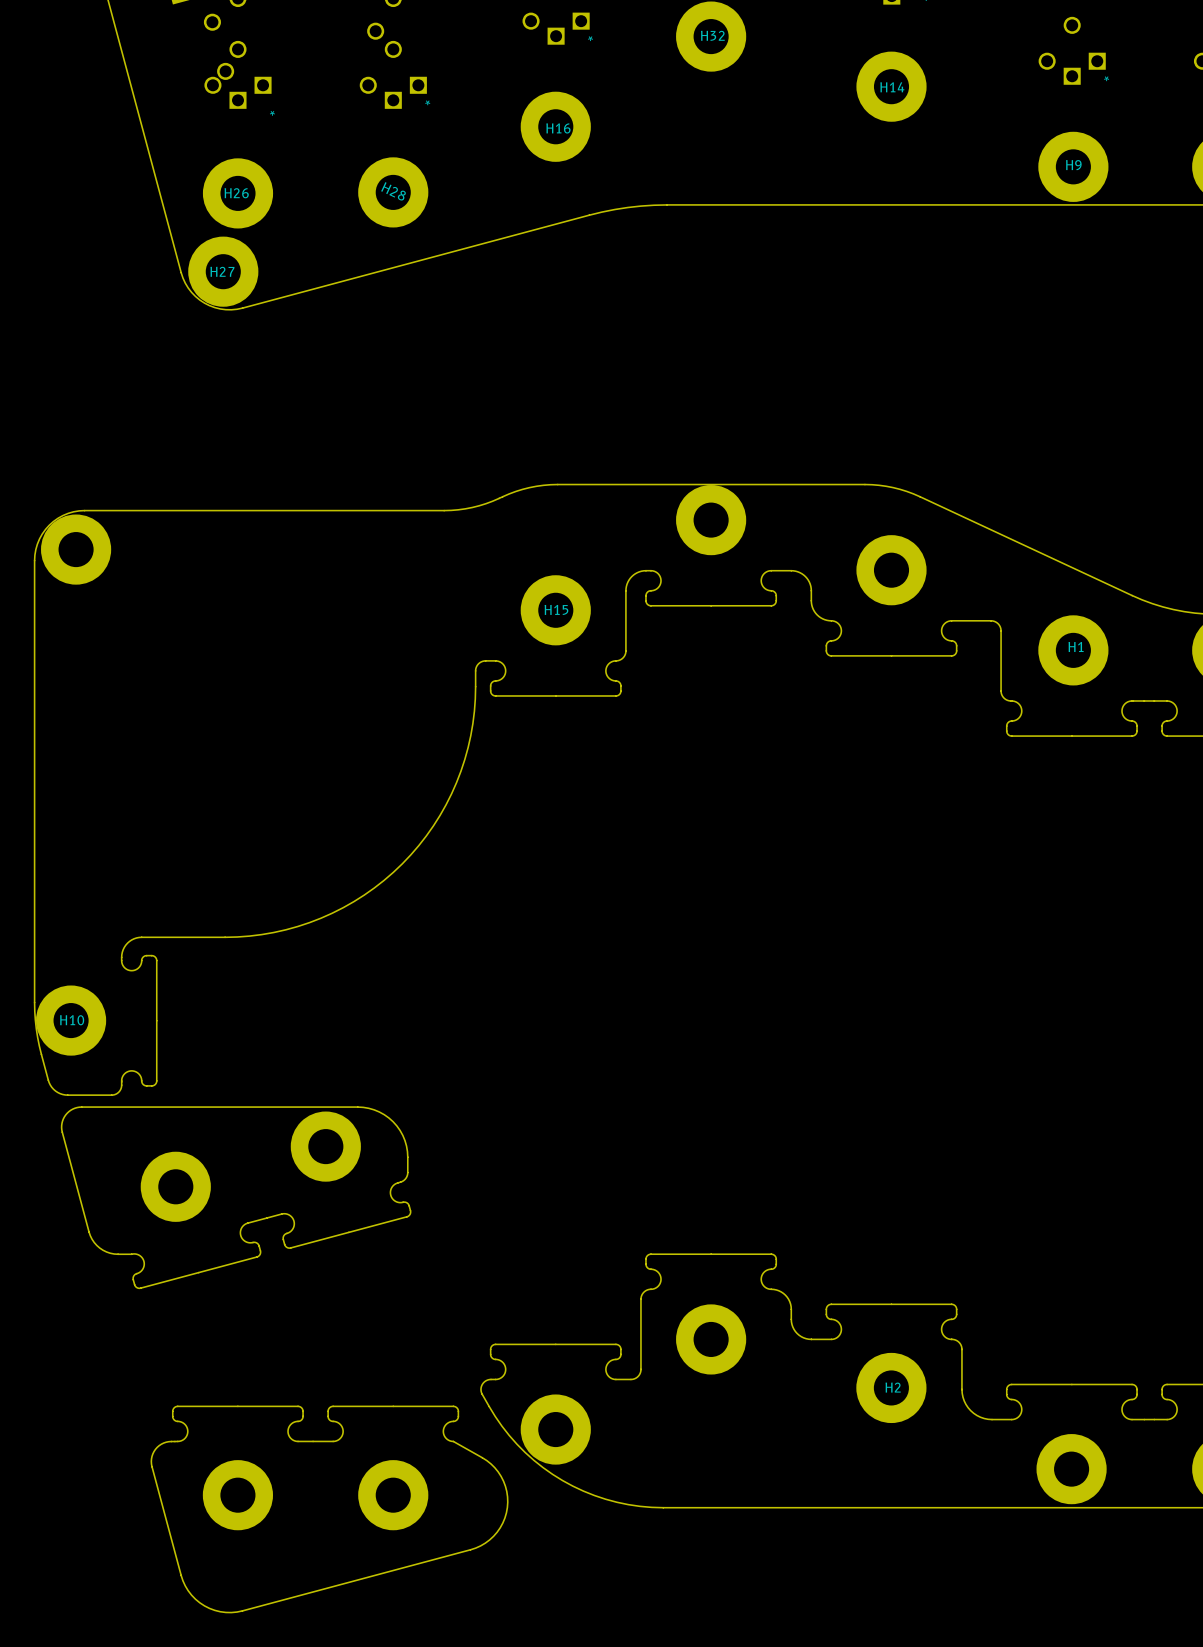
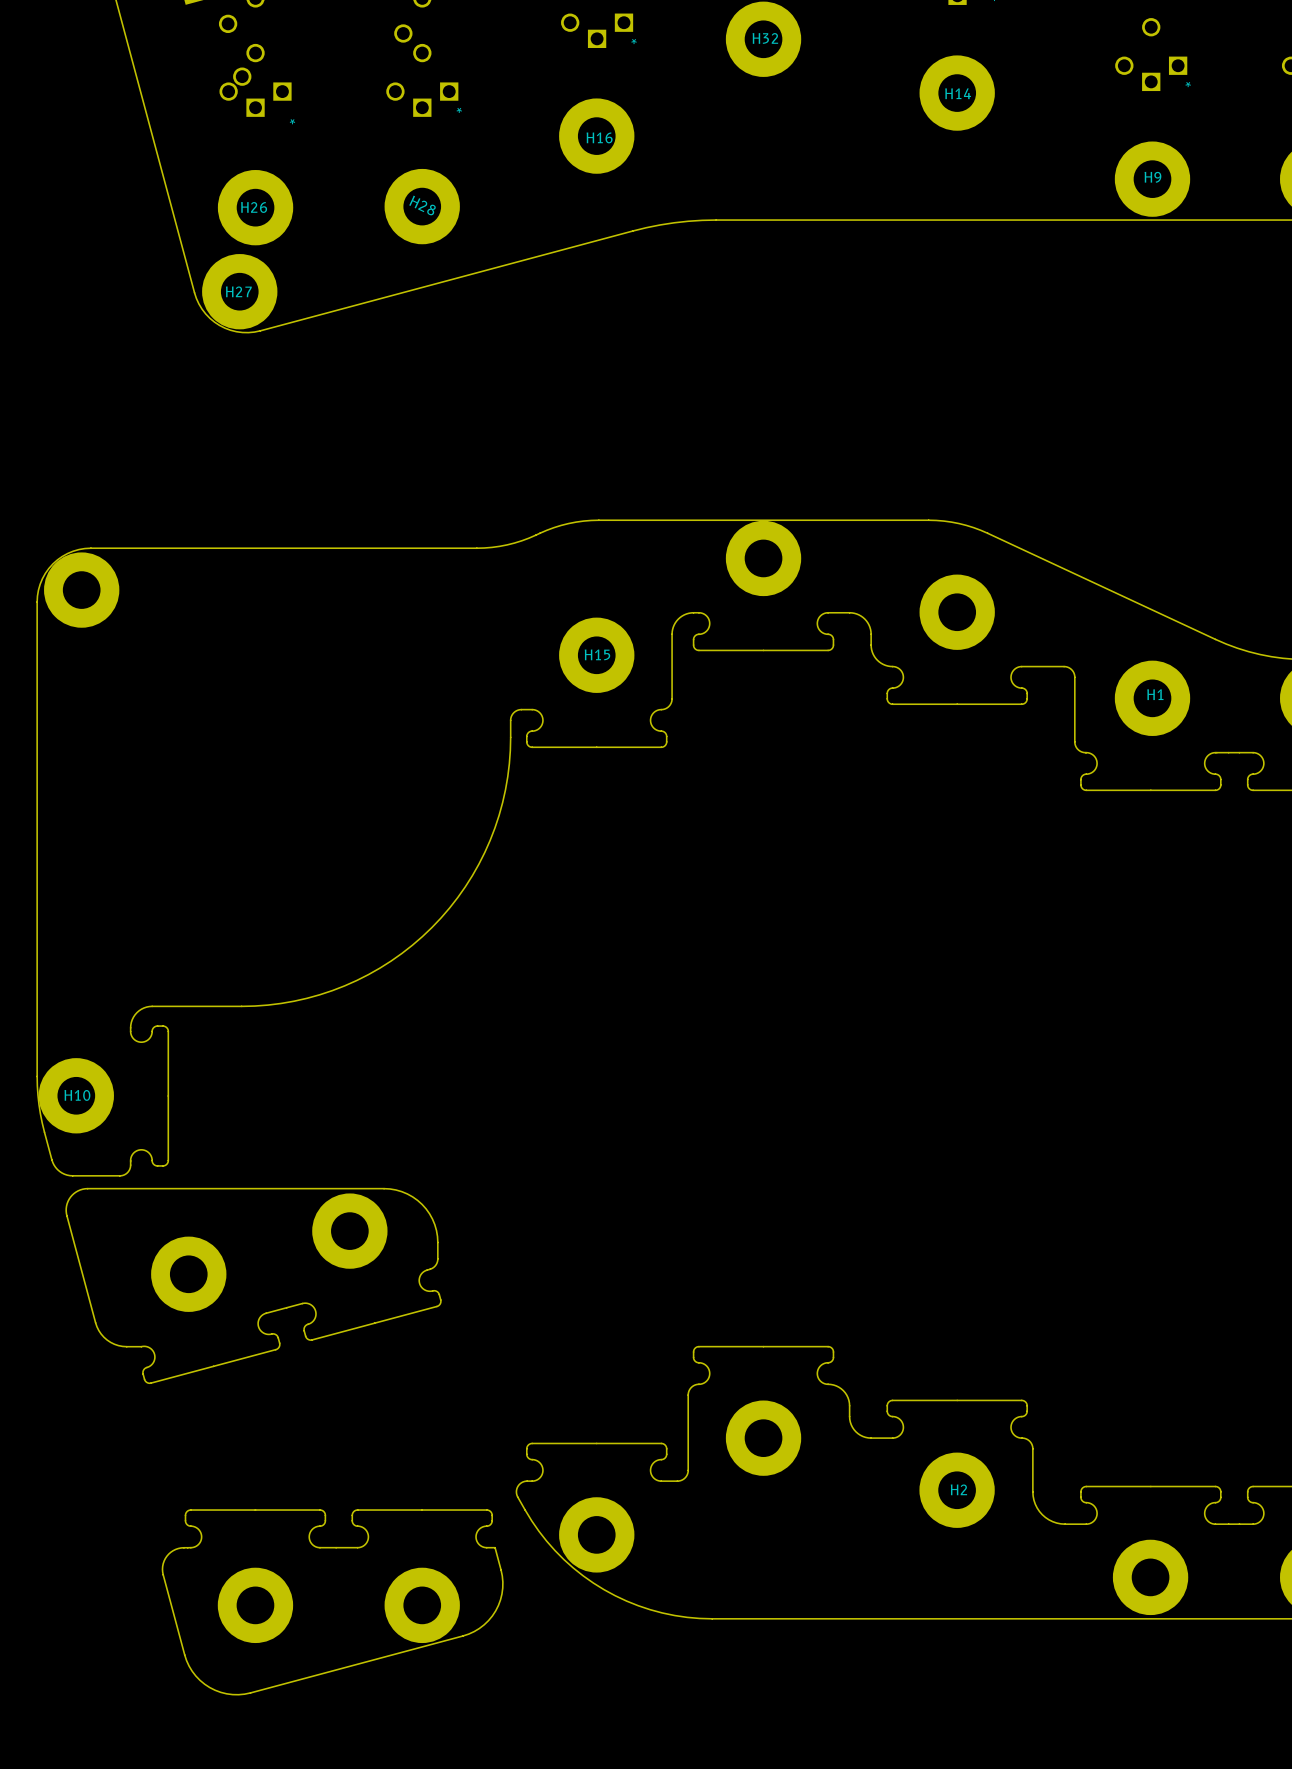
board edge: (453, 1441) (491, 1463) (501, 1476) (506, 1491) (507, 1507) (502, 1523) (493, 1536) (475, 1548) (242, 1610) (225, 1612) (204, 1605) (188, 1590) (181, 1575) (172, 1541) -> (486, 1547) (495, 1547) (502, 1576) (501, 1594) (495, 1610) (488, 1620) (468, 1634) (238, 1694) (220, 1692) (204, 1684) (192, 1671) (184, 1654)

